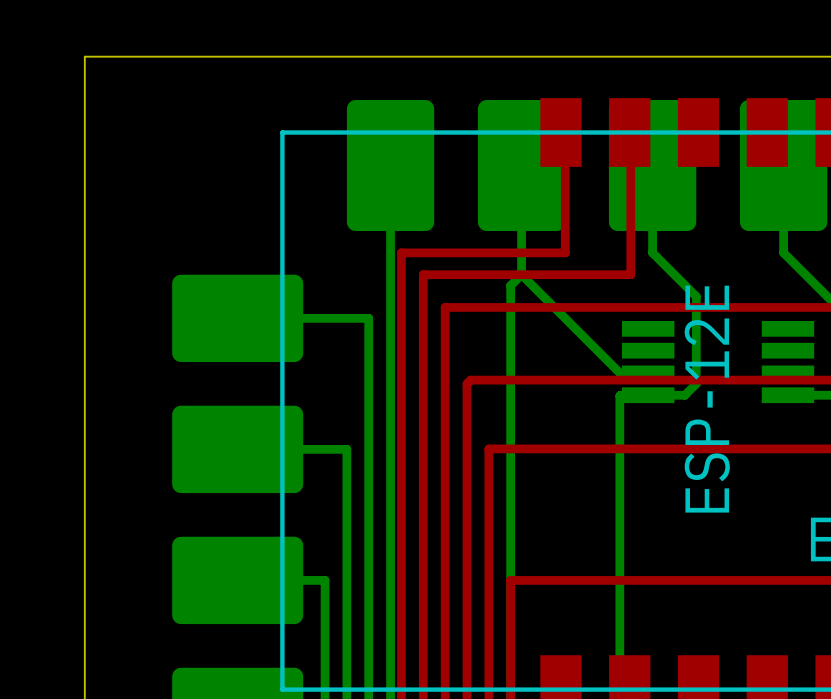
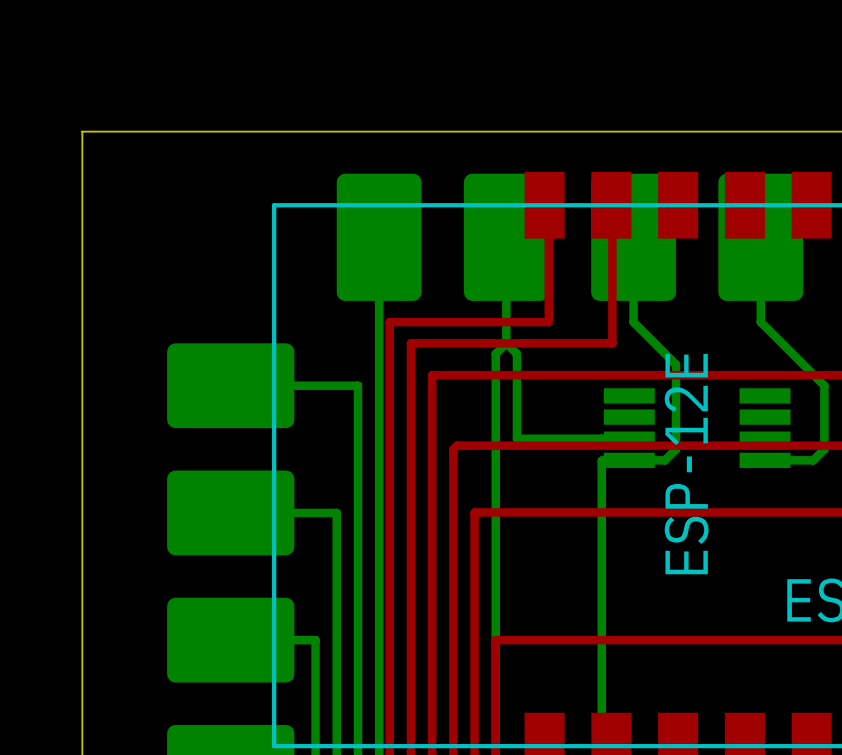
bottom track: (532, 285) (619, 372) -> (516, 353) (516, 438) (601, 438)

